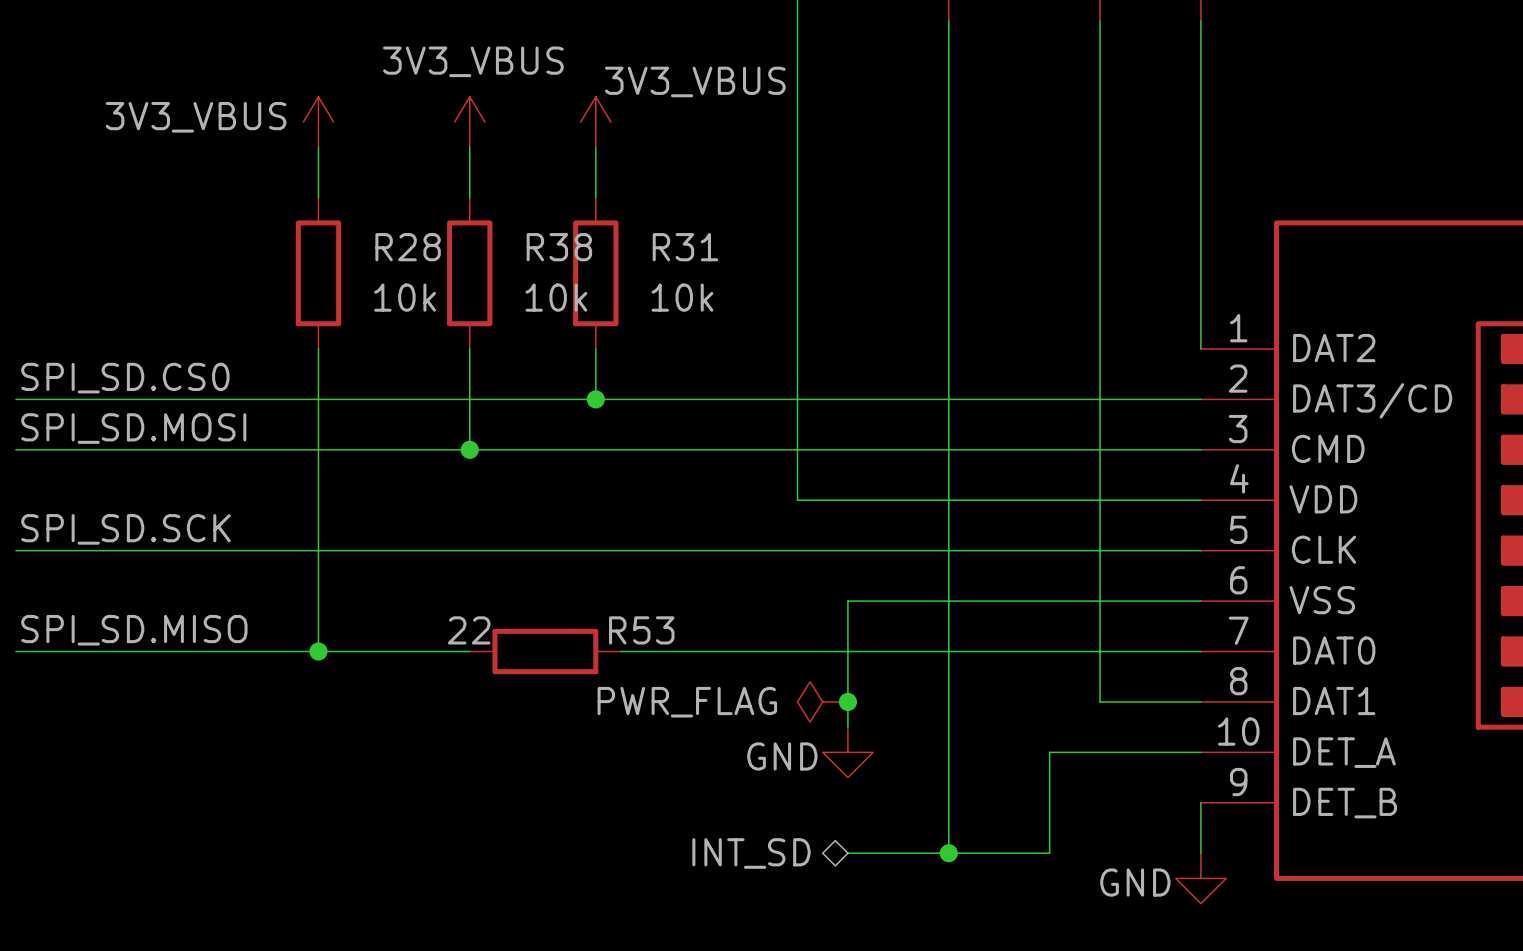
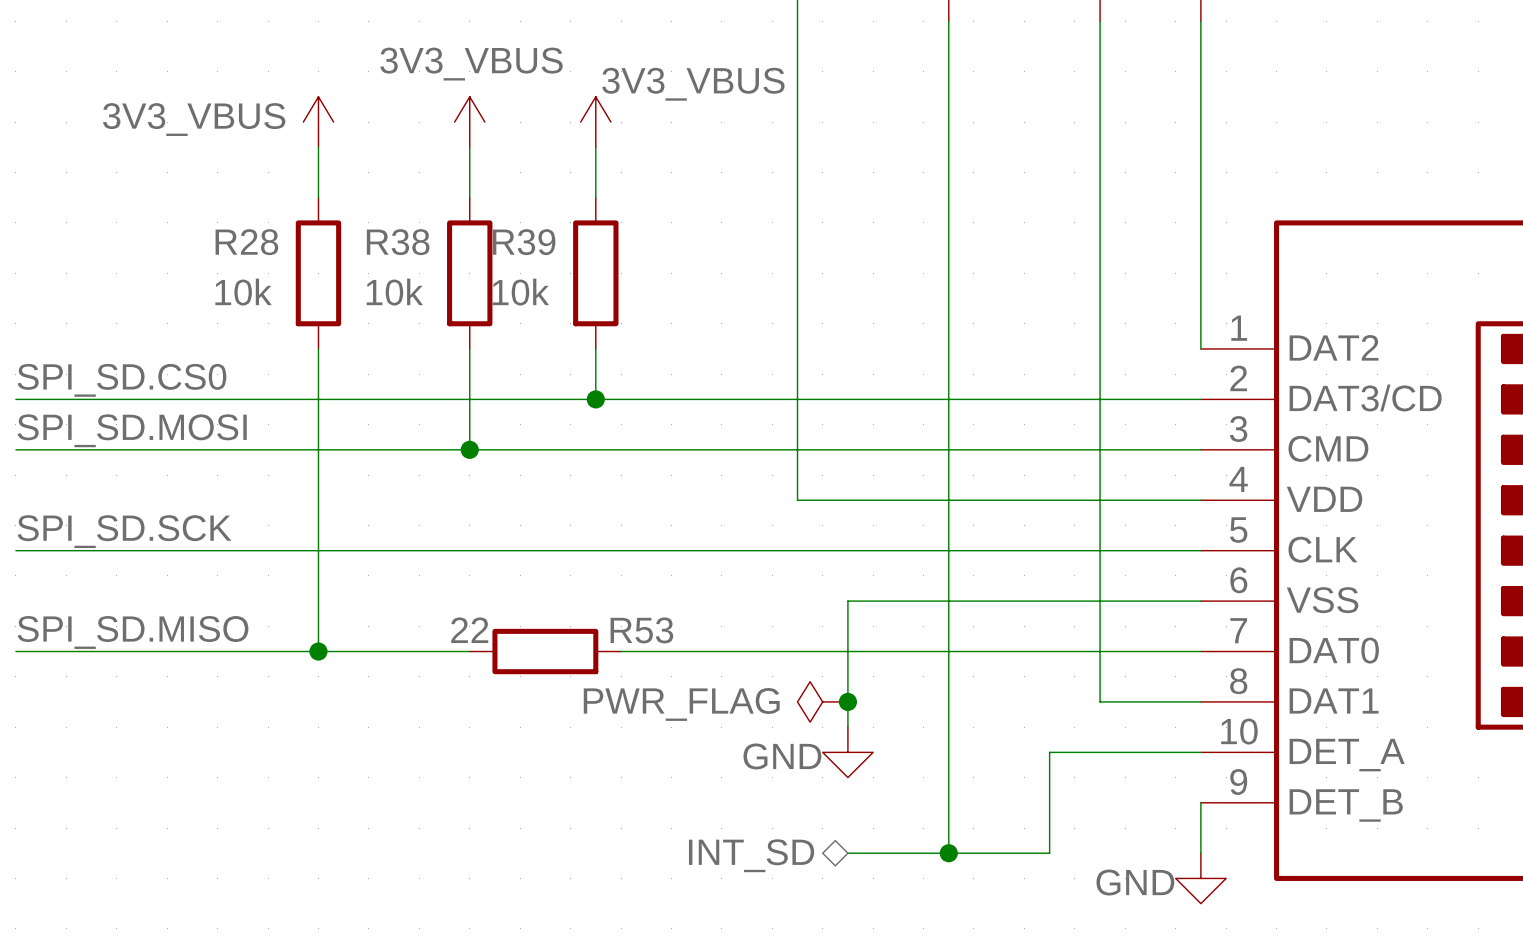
R28 name position: R28 (408, 247) -> R28 (246, 242)
R38 name position: R38 (559, 247) -> R38 (398, 242)
R31 name: R31 (685, 247) -> R39 (524, 242)
R28 value position: 10k (405, 297) -> 10k (243, 292)
R38 value position: 10k (556, 297) -> 10k (394, 292)
R31 value position: 10k (682, 297) -> 10k (520, 292)

